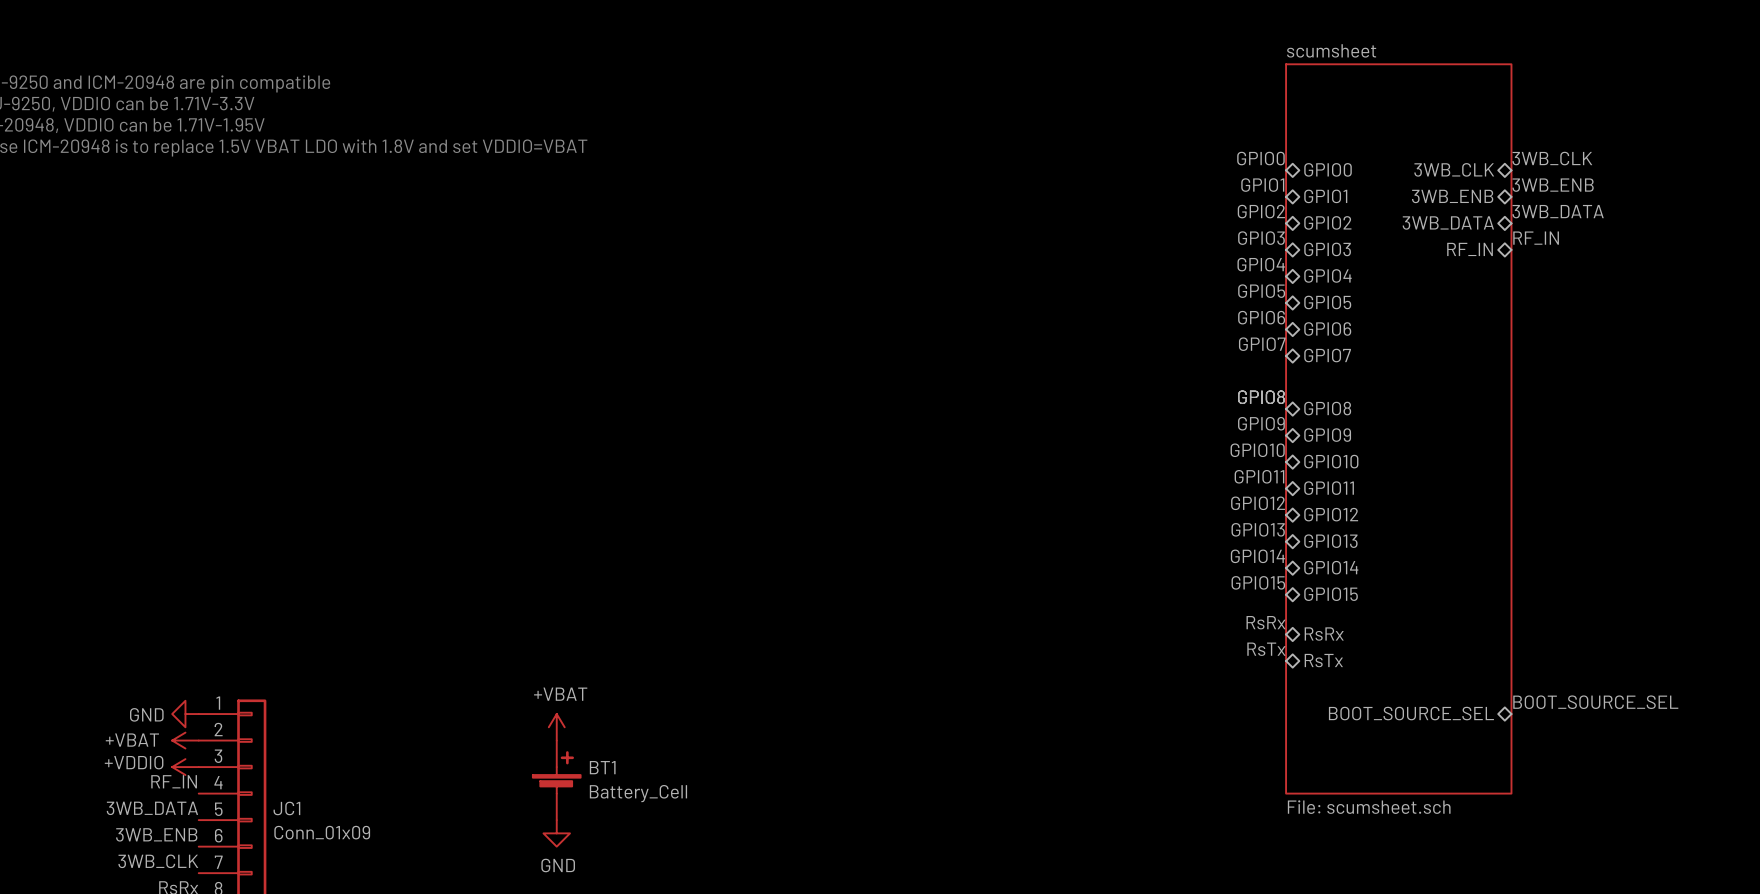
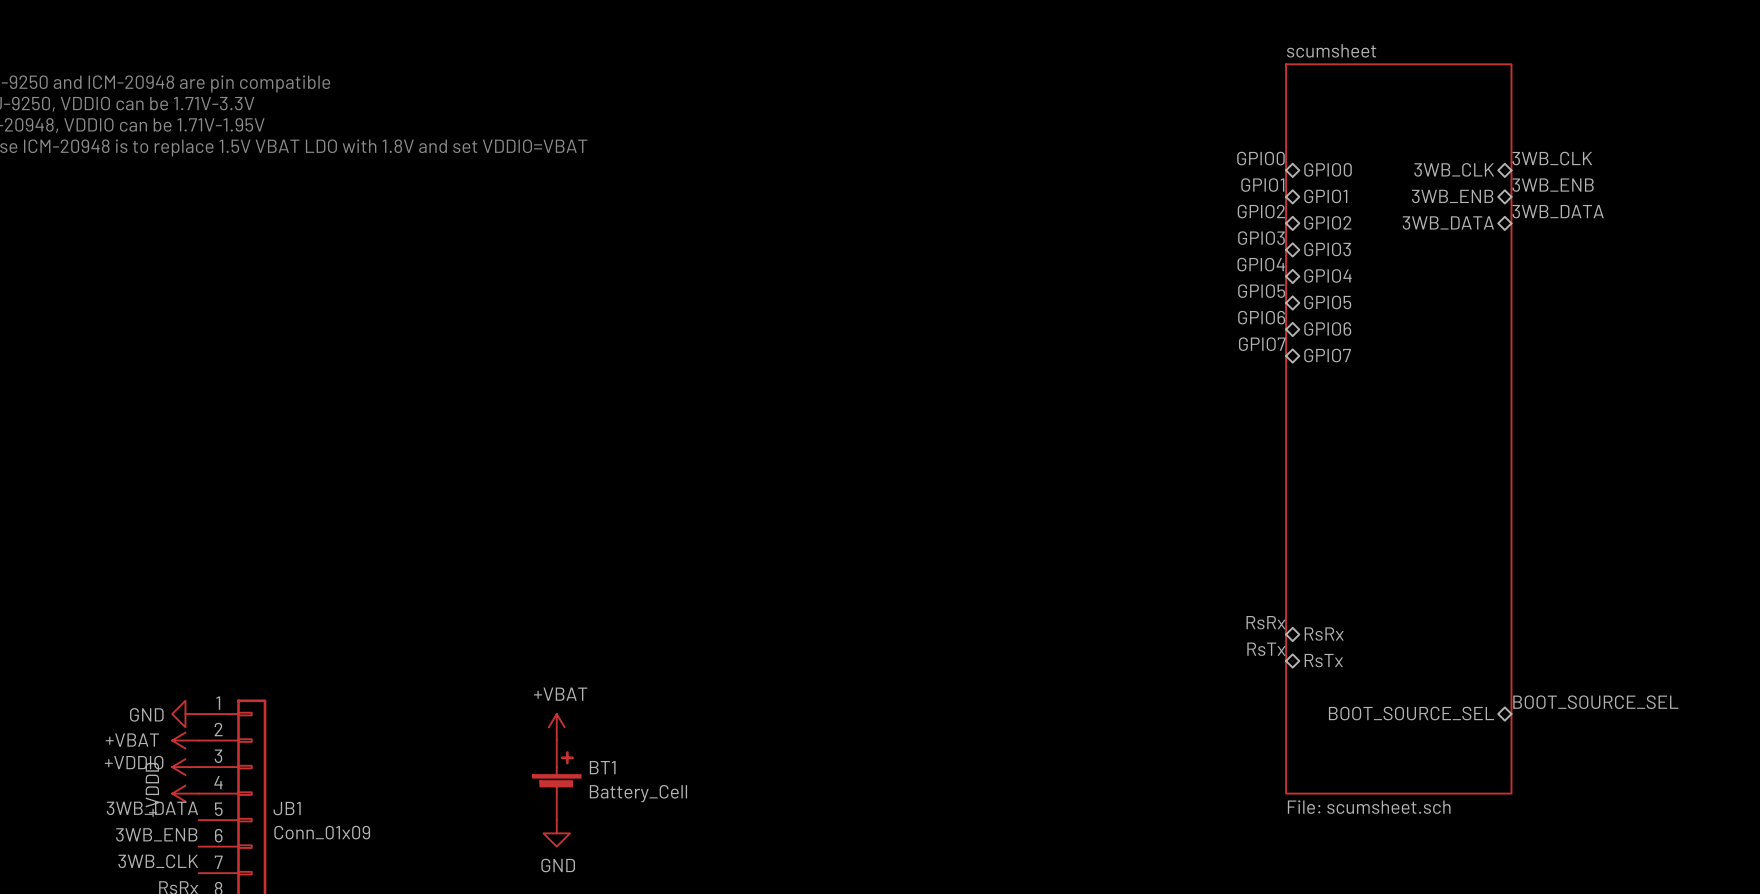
label: RF_IN (1536, 238) -> none
sheet pin: RF_IN (1470, 249) -> none
label: GPIO8 (1261, 397) -> none
sheet pin: GPIO8 (1327, 408) -> none
label: GPIO9 (1261, 423) -> none
sheet pin: GPIO9 (1327, 435) -> none
label: GPIO10 (1257, 450) -> none
sheet pin: GPIO10 (1331, 461) -> none
label: GPIO11 (1259, 476) -> none
sheet pin: GPIO11 (1329, 488) -> none
label: GPIO12 (1258, 503) -> none
sheet pin: GPIO12 (1331, 514) -> none
label: GPIO13 (1258, 529) -> none
sheet pin: GPIO13 (1330, 541) -> none
label: GPIO14 (1257, 556) -> none
sheet pin: GPIO14 (1331, 567) -> none
label: GPIO15 (1258, 582) -> none
sheet pin: GPIO15 (1331, 594) -> none
label: RF_IN (174, 781) -> none
power symbol: none -> +VDDD (185, 793)
JC1 name: JC1 (286, 808) -> JB1 (287, 808)

